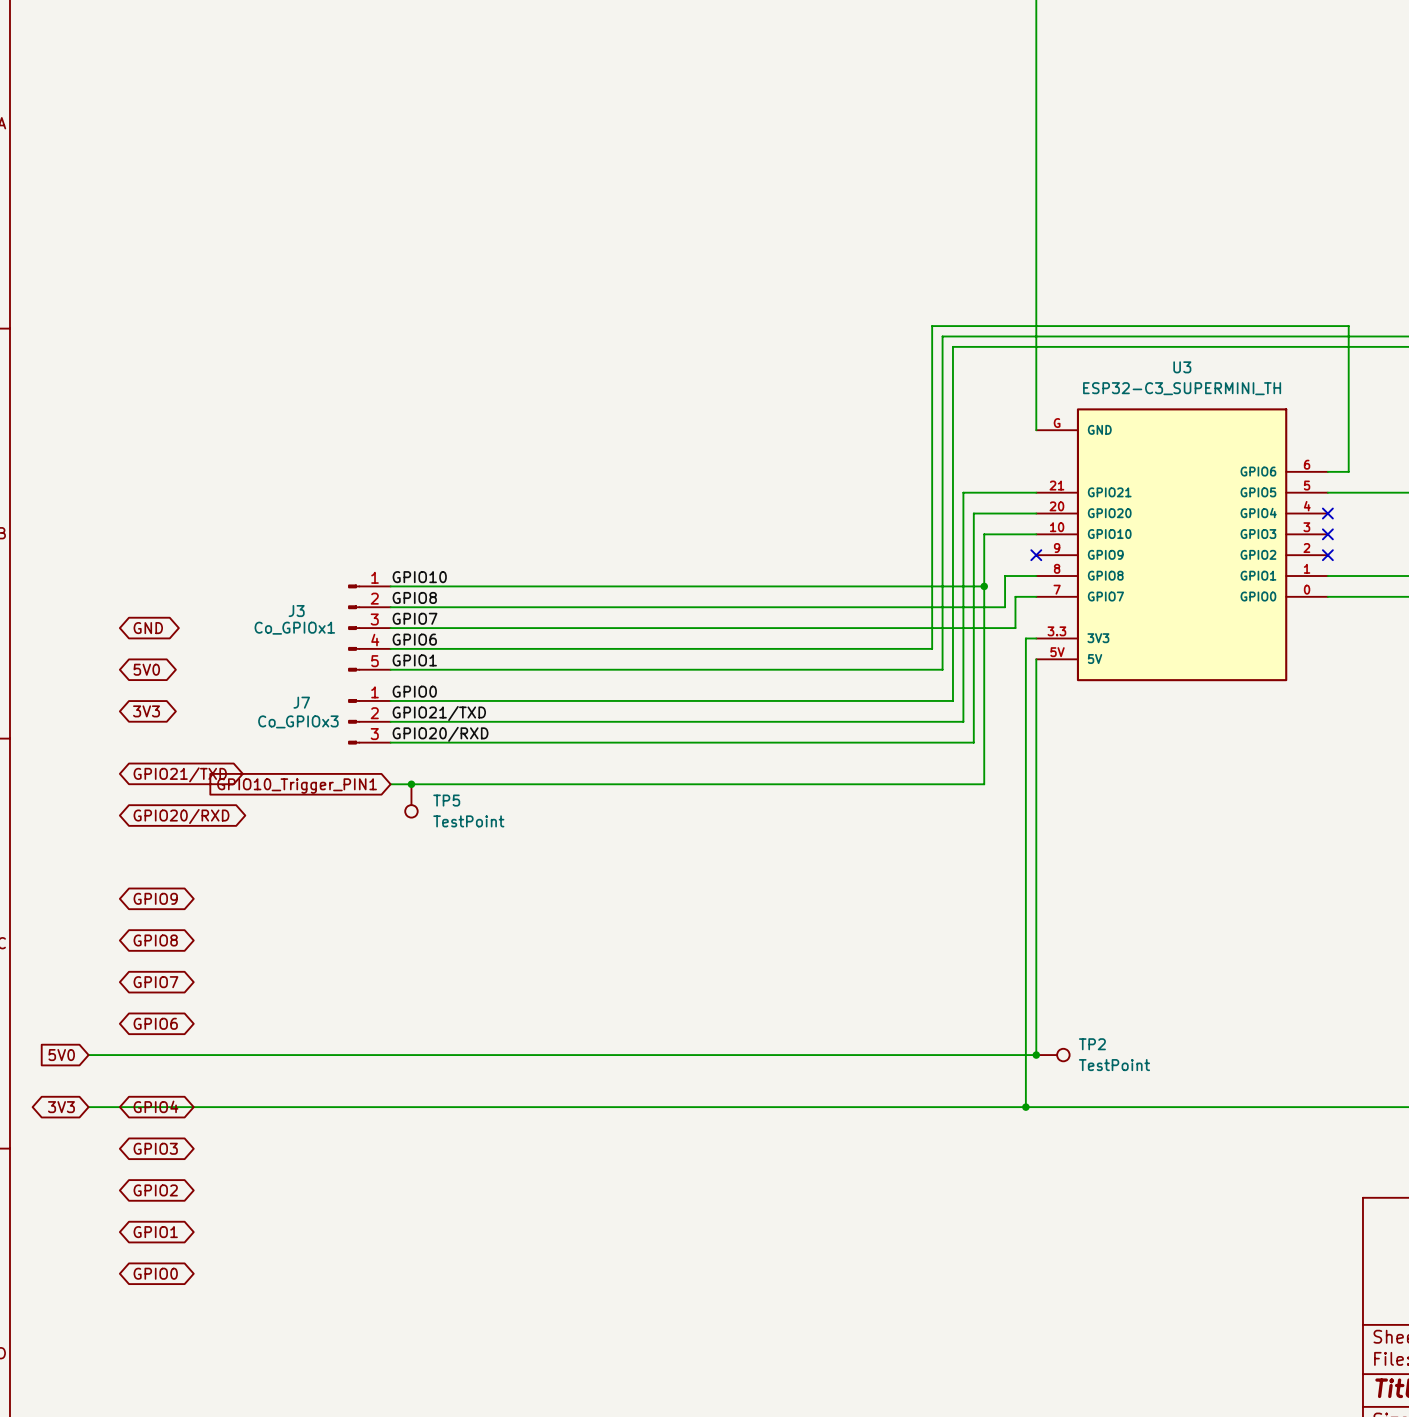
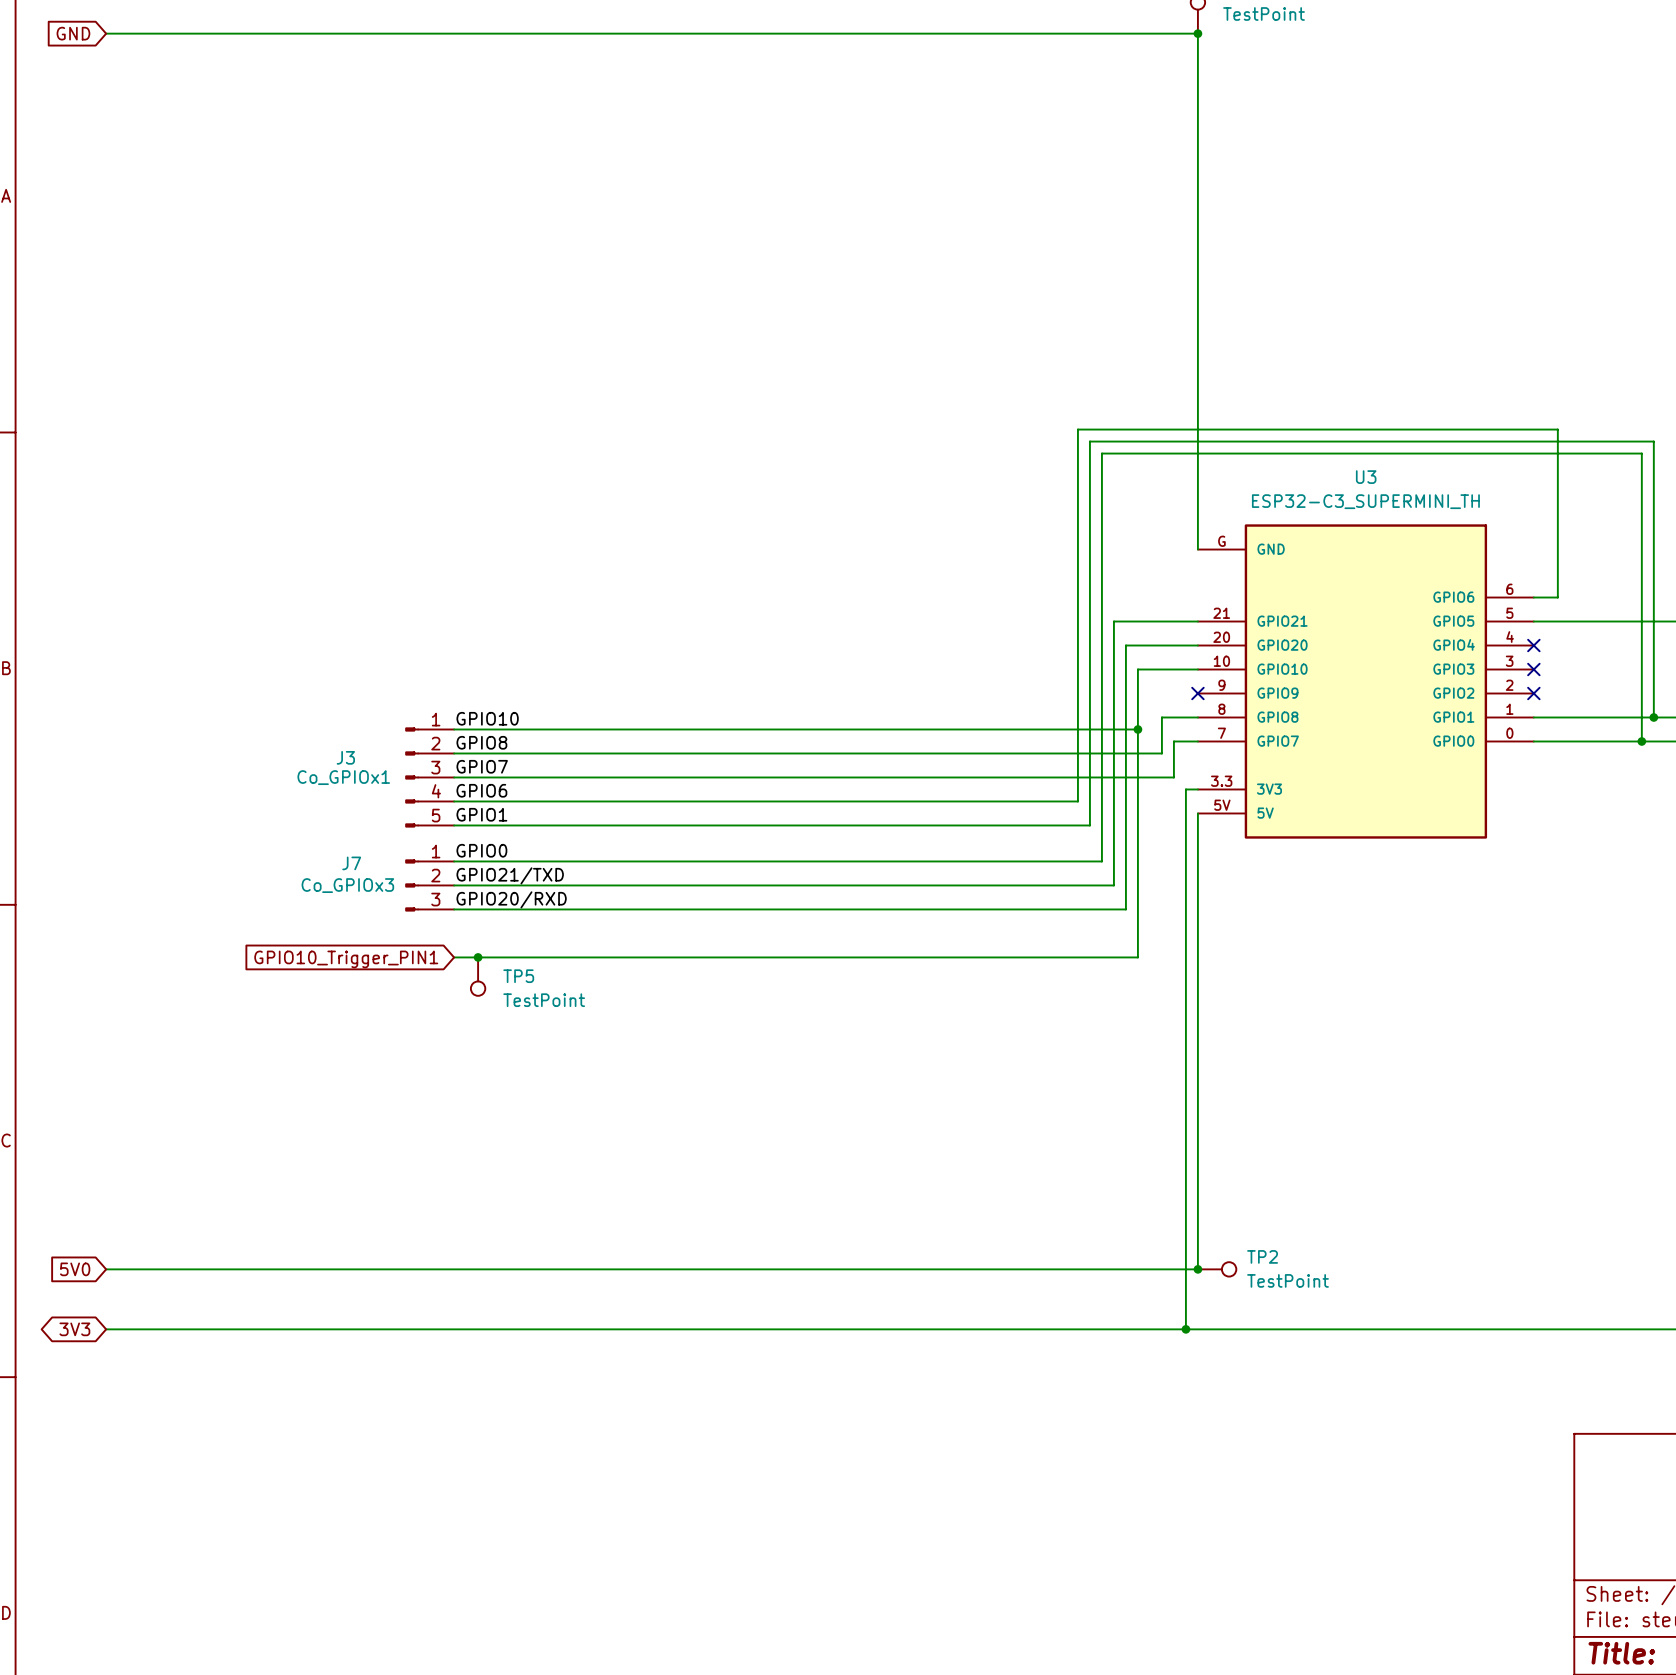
global label: GND (148, 628) -> none
global label: 5V0 (146, 669) -> none
global label: 3V3 (146, 711) -> none
global label: GPIO21/TXD (180, 774) -> none
global label: GPIO20/RXD (181, 816) -> none
global label: GPIO9 (155, 898) -> none
global label: GPIO8 (155, 940) -> none
global label: GPIO7 (155, 982) -> none
global label: GPIO6 (155, 1023) -> none
global label: GPIO4 (155, 1106) -> none
global label: GPIO3 (155, 1148) -> none
global label: GPIO2 (155, 1190) -> none
global label: GPIO1 (155, 1232) -> none
global label: GPIO0 (155, 1273) -> none

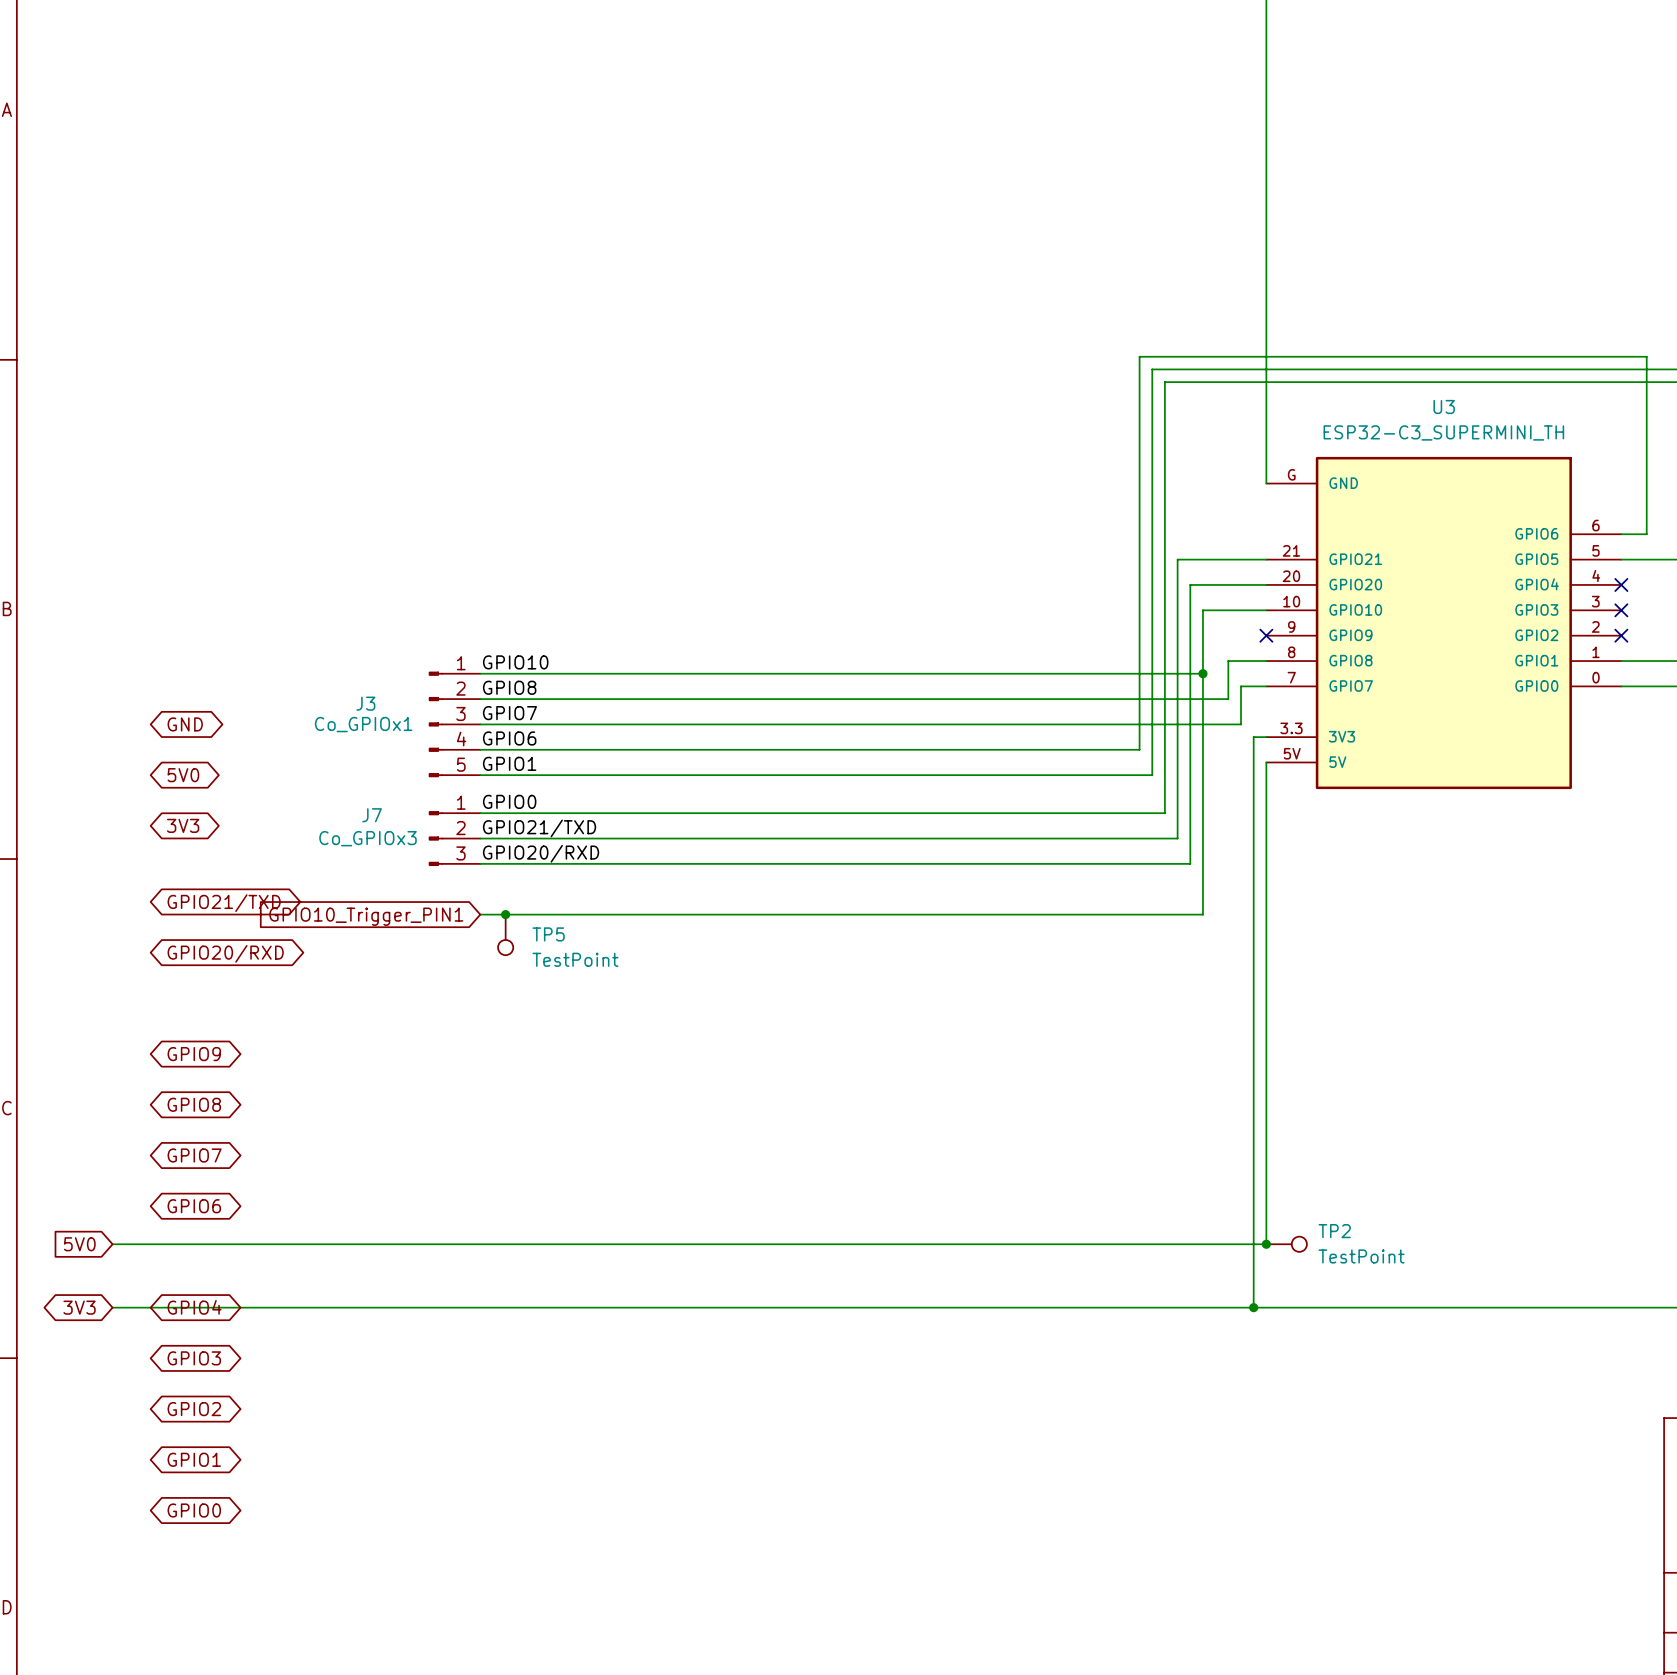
global label: none -> GND (185, 724)
global label: none -> 5V0 (183, 775)
global label: none -> 3V3 (183, 825)
global label: none -> GPIO21/TXD (224, 903)
global label: none -> GPIO20/RXD (225, 953)
global label: none -> GPIO9 (194, 1054)
global label: none -> GPIO8 (194, 1104)
global label: none -> GPIO7 (194, 1155)
global label: none -> GPIO6 (194, 1206)
global label: none -> GPIO4 (194, 1307)
global label: none -> GPIO3 (194, 1358)
global label: none -> GPIO2 (194, 1409)
global label: none -> GPIO1 (194, 1459)
global label: none -> GPIO0 (194, 1510)

